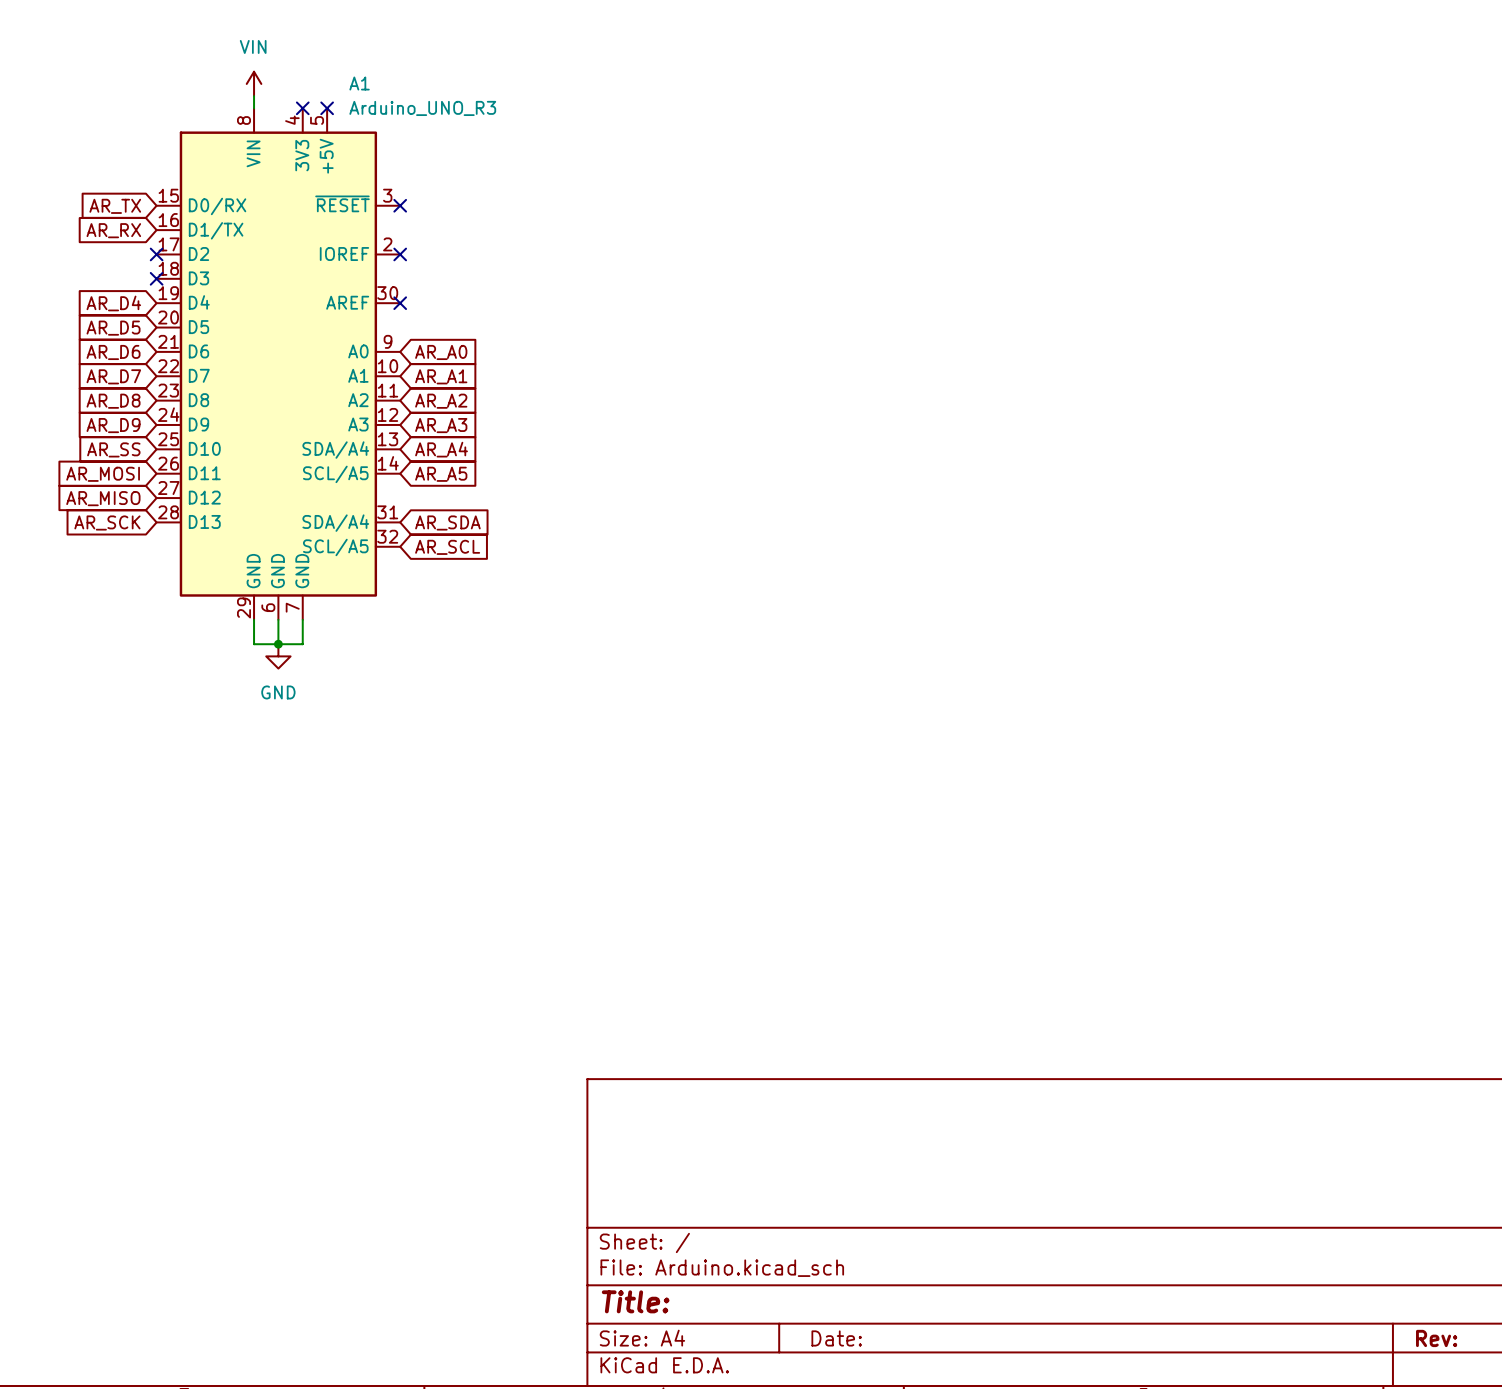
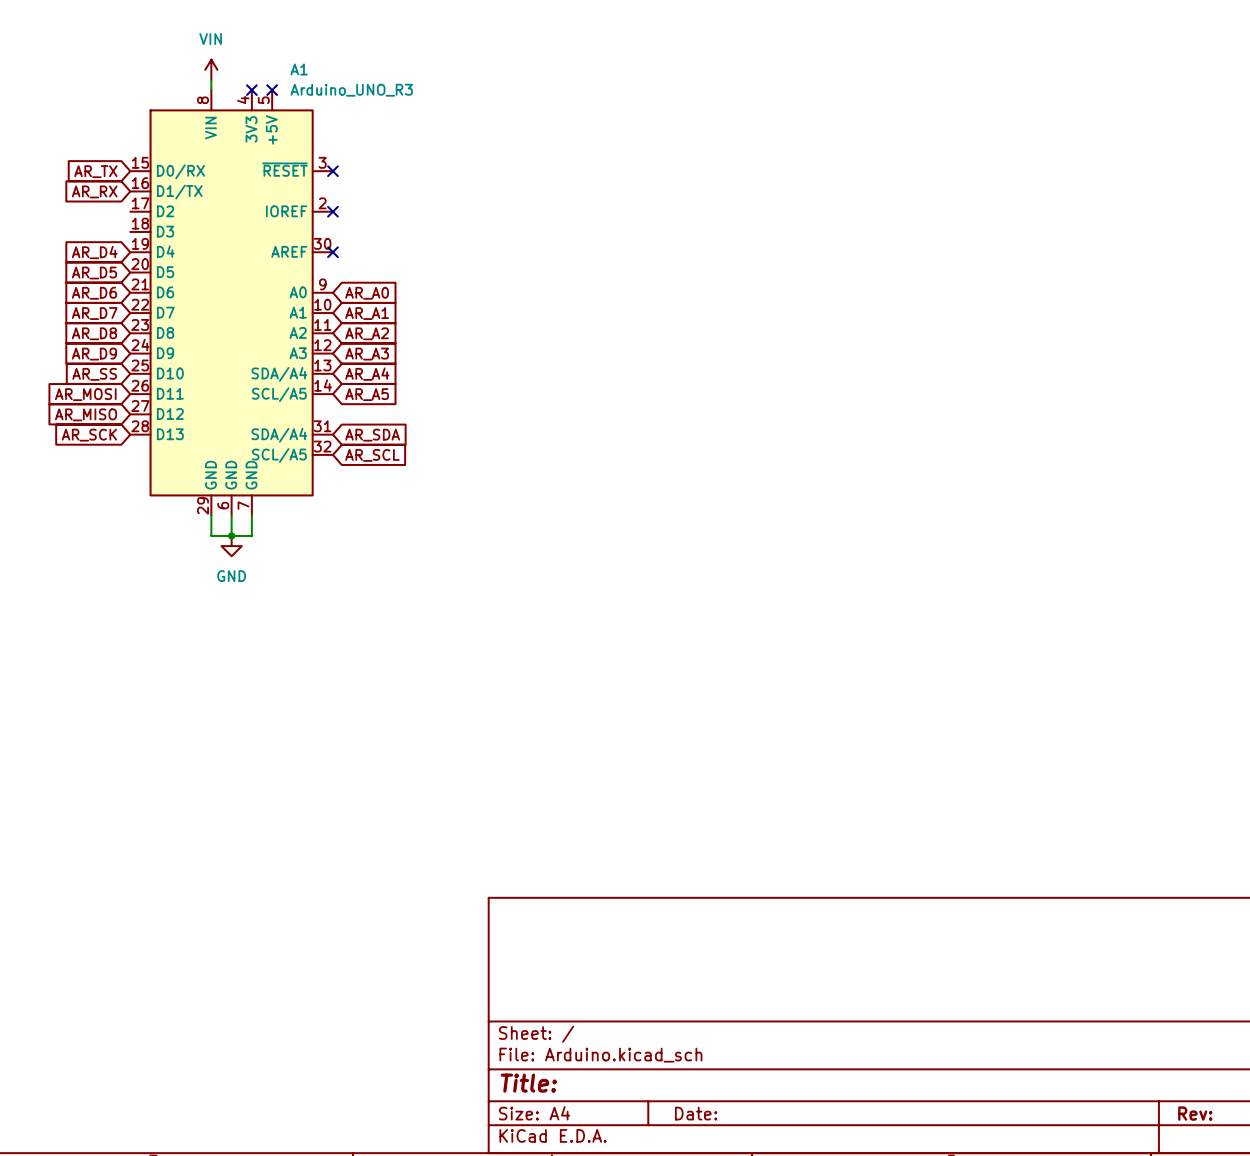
no-connect mark: (156, 254) -> none
no-connect mark: (156, 278) -> none

